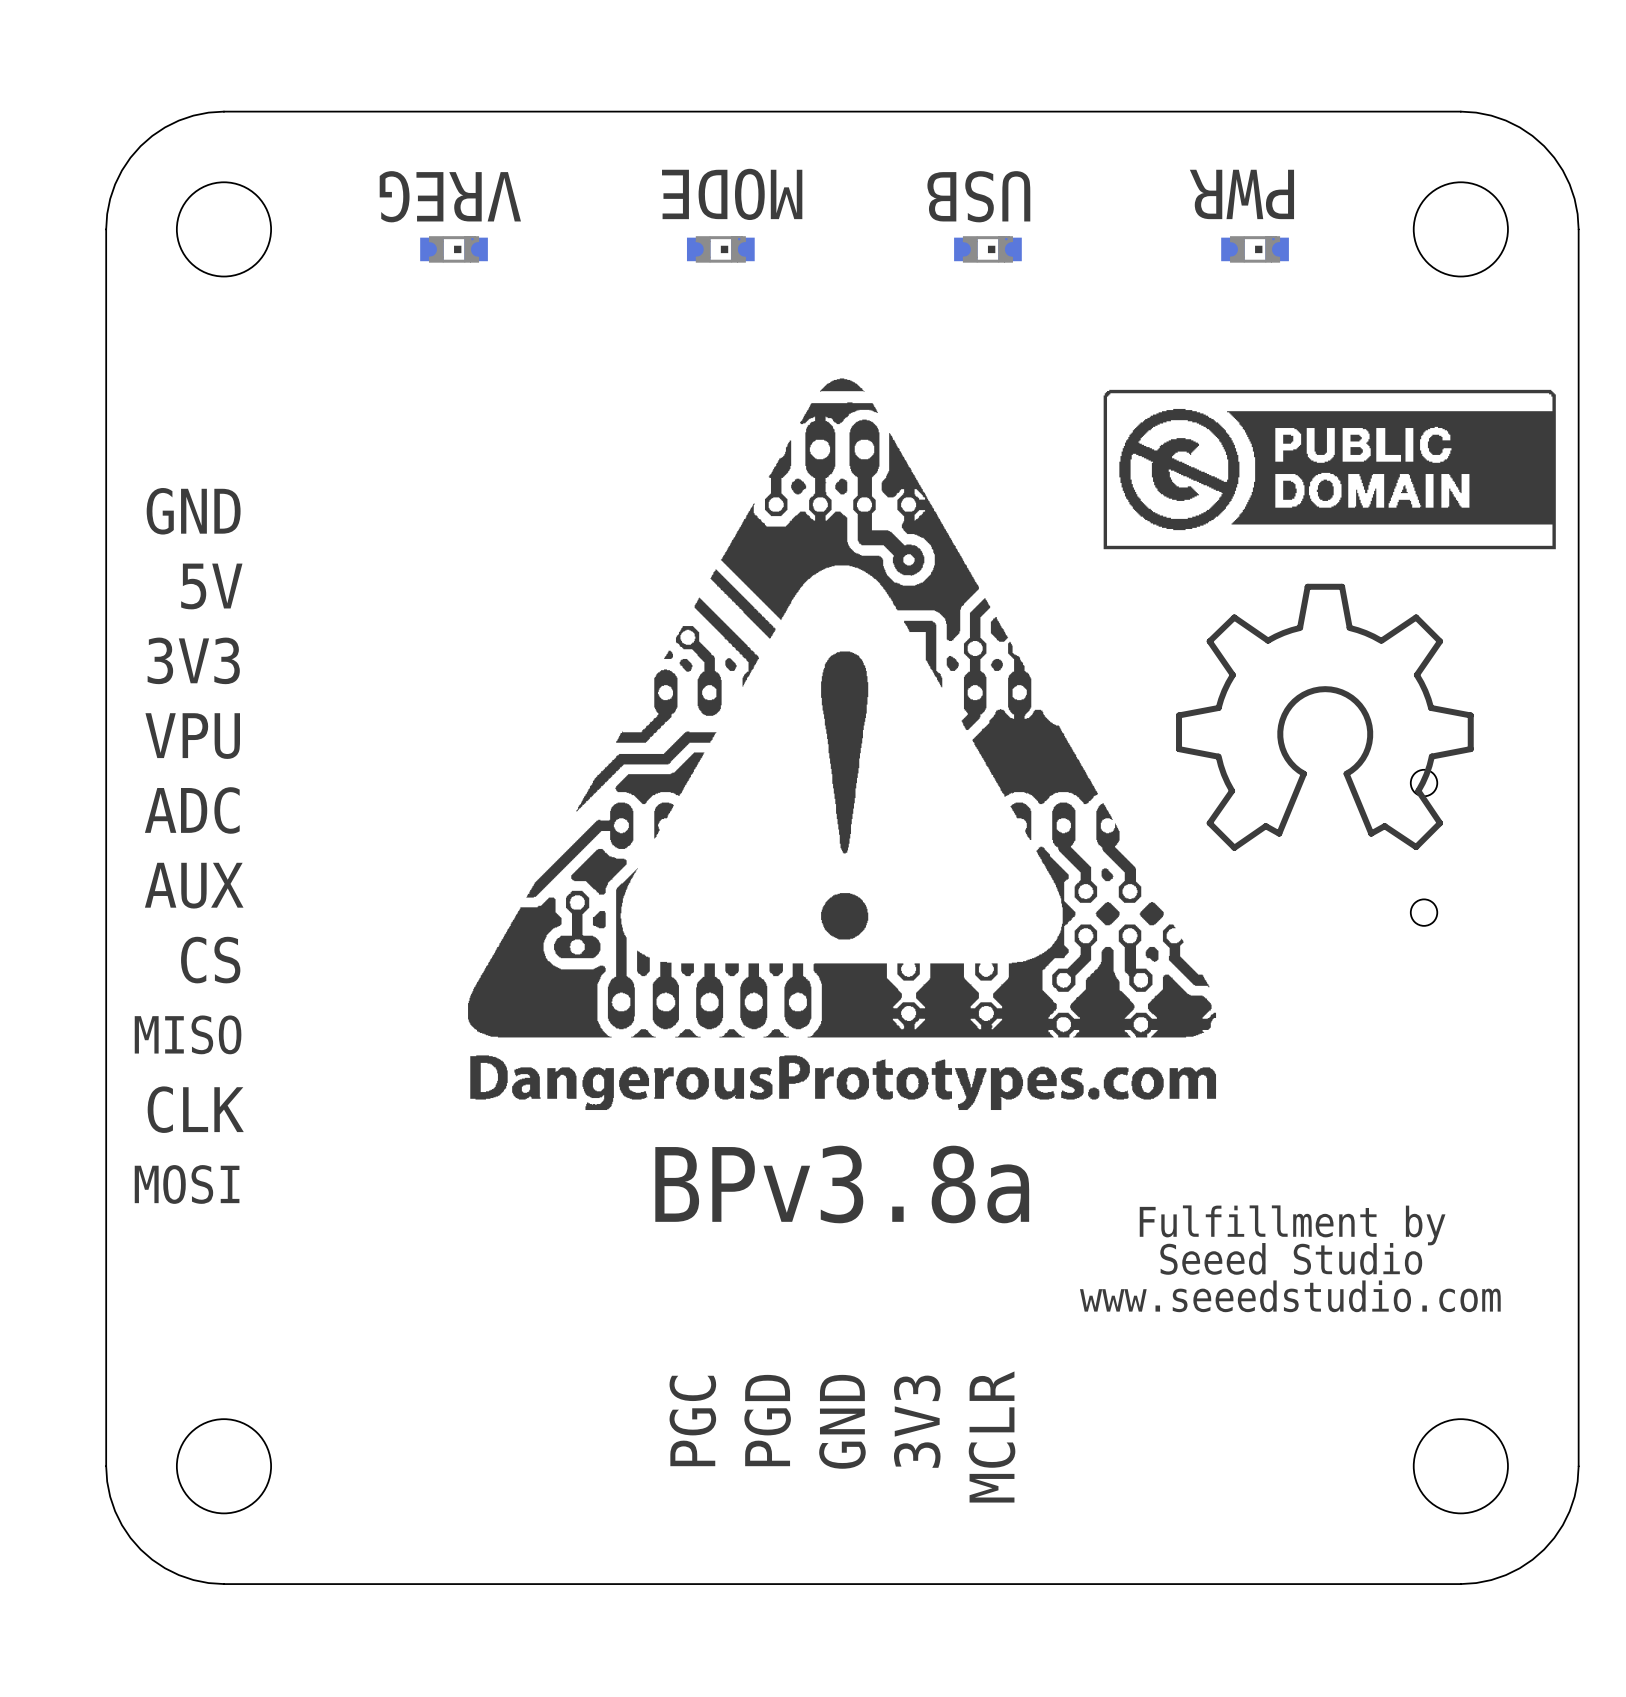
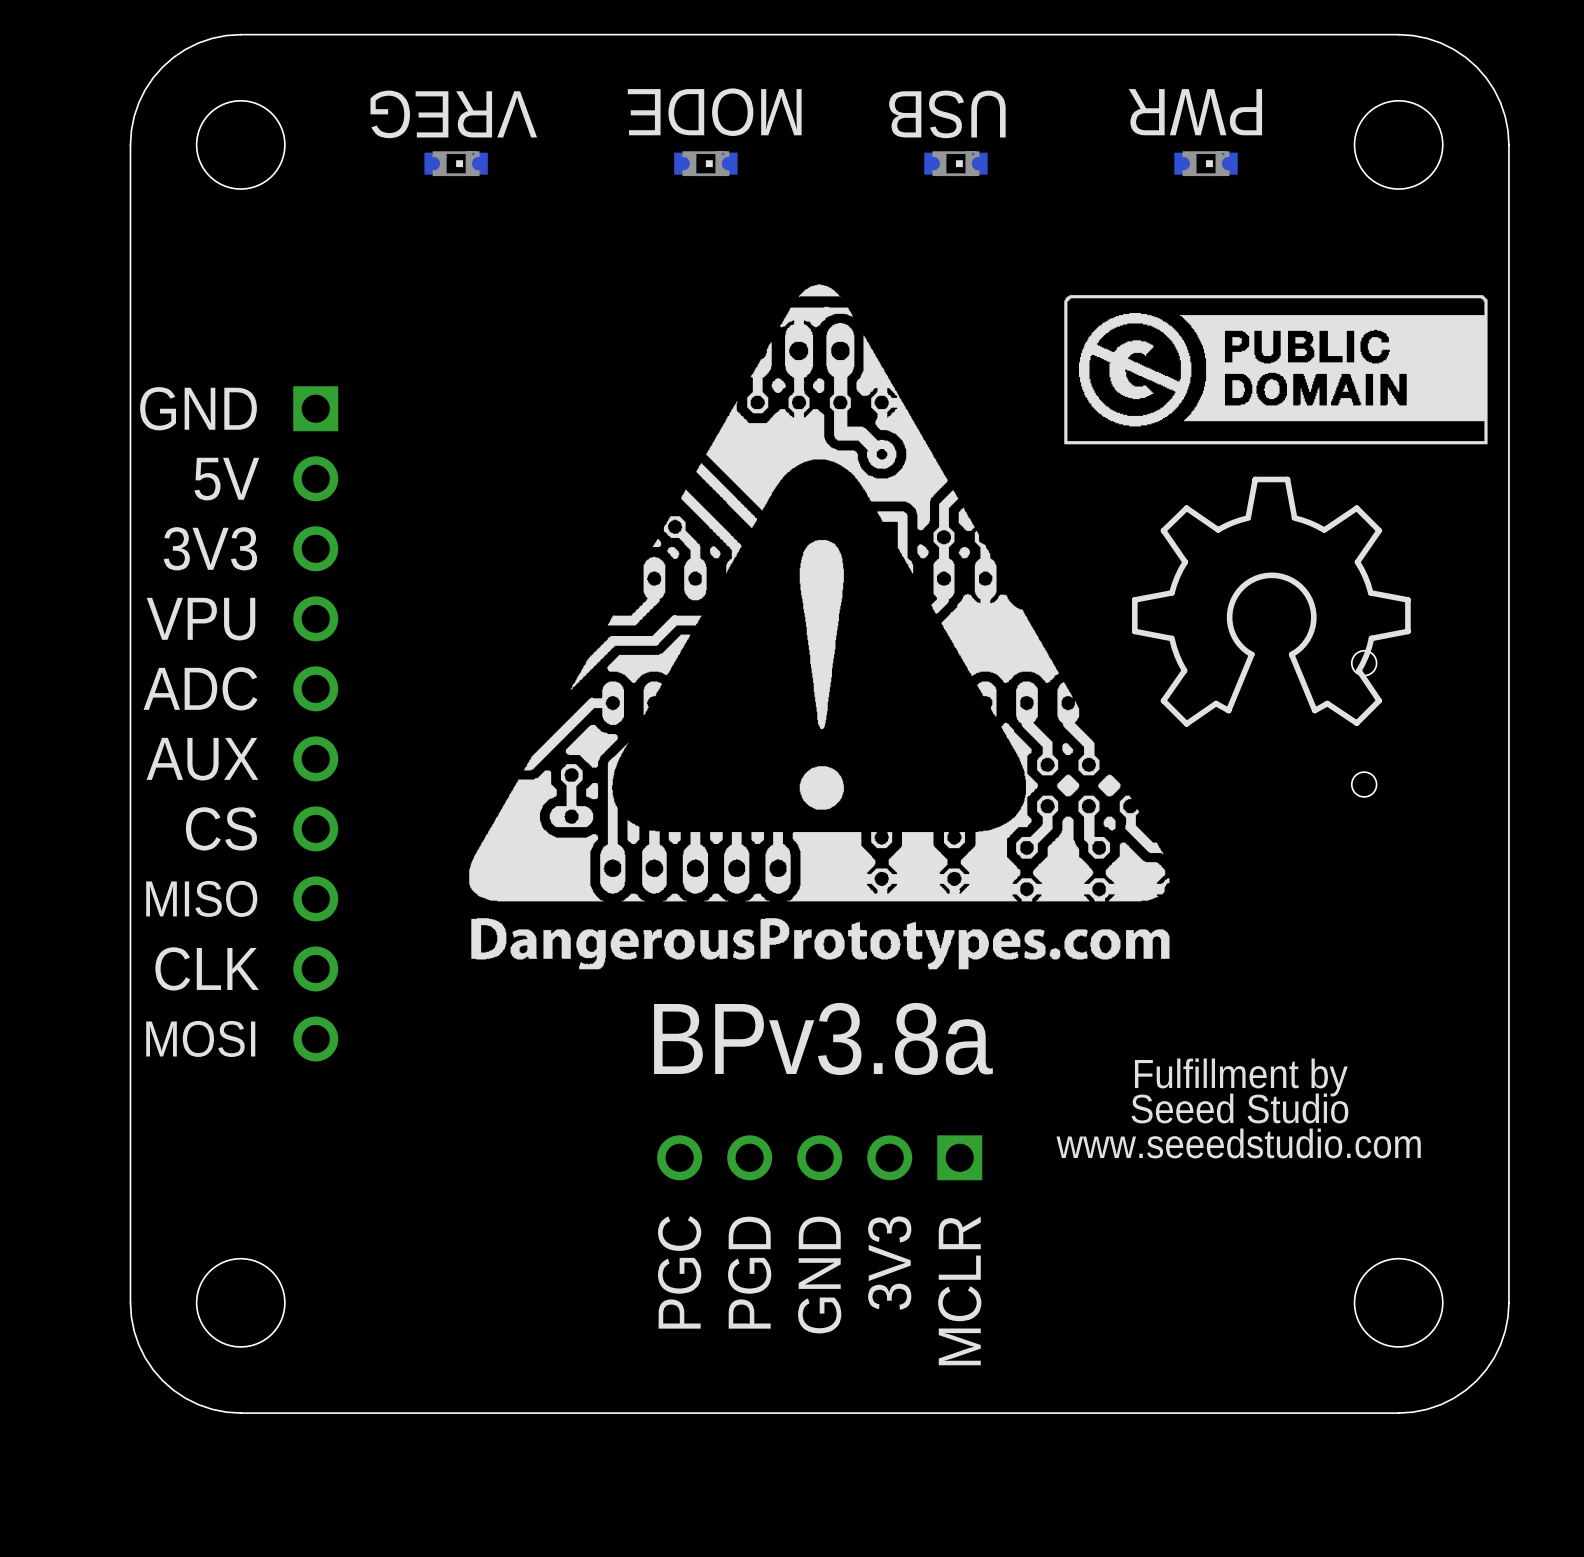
part: none -> (315, 723)
part: none -> (819, 1157)

